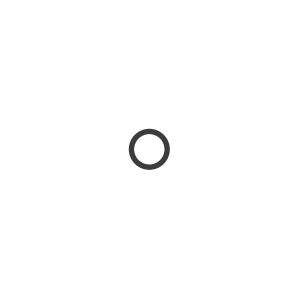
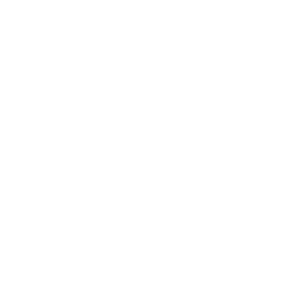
drawing: [128, 128, 170, 170] -> none

